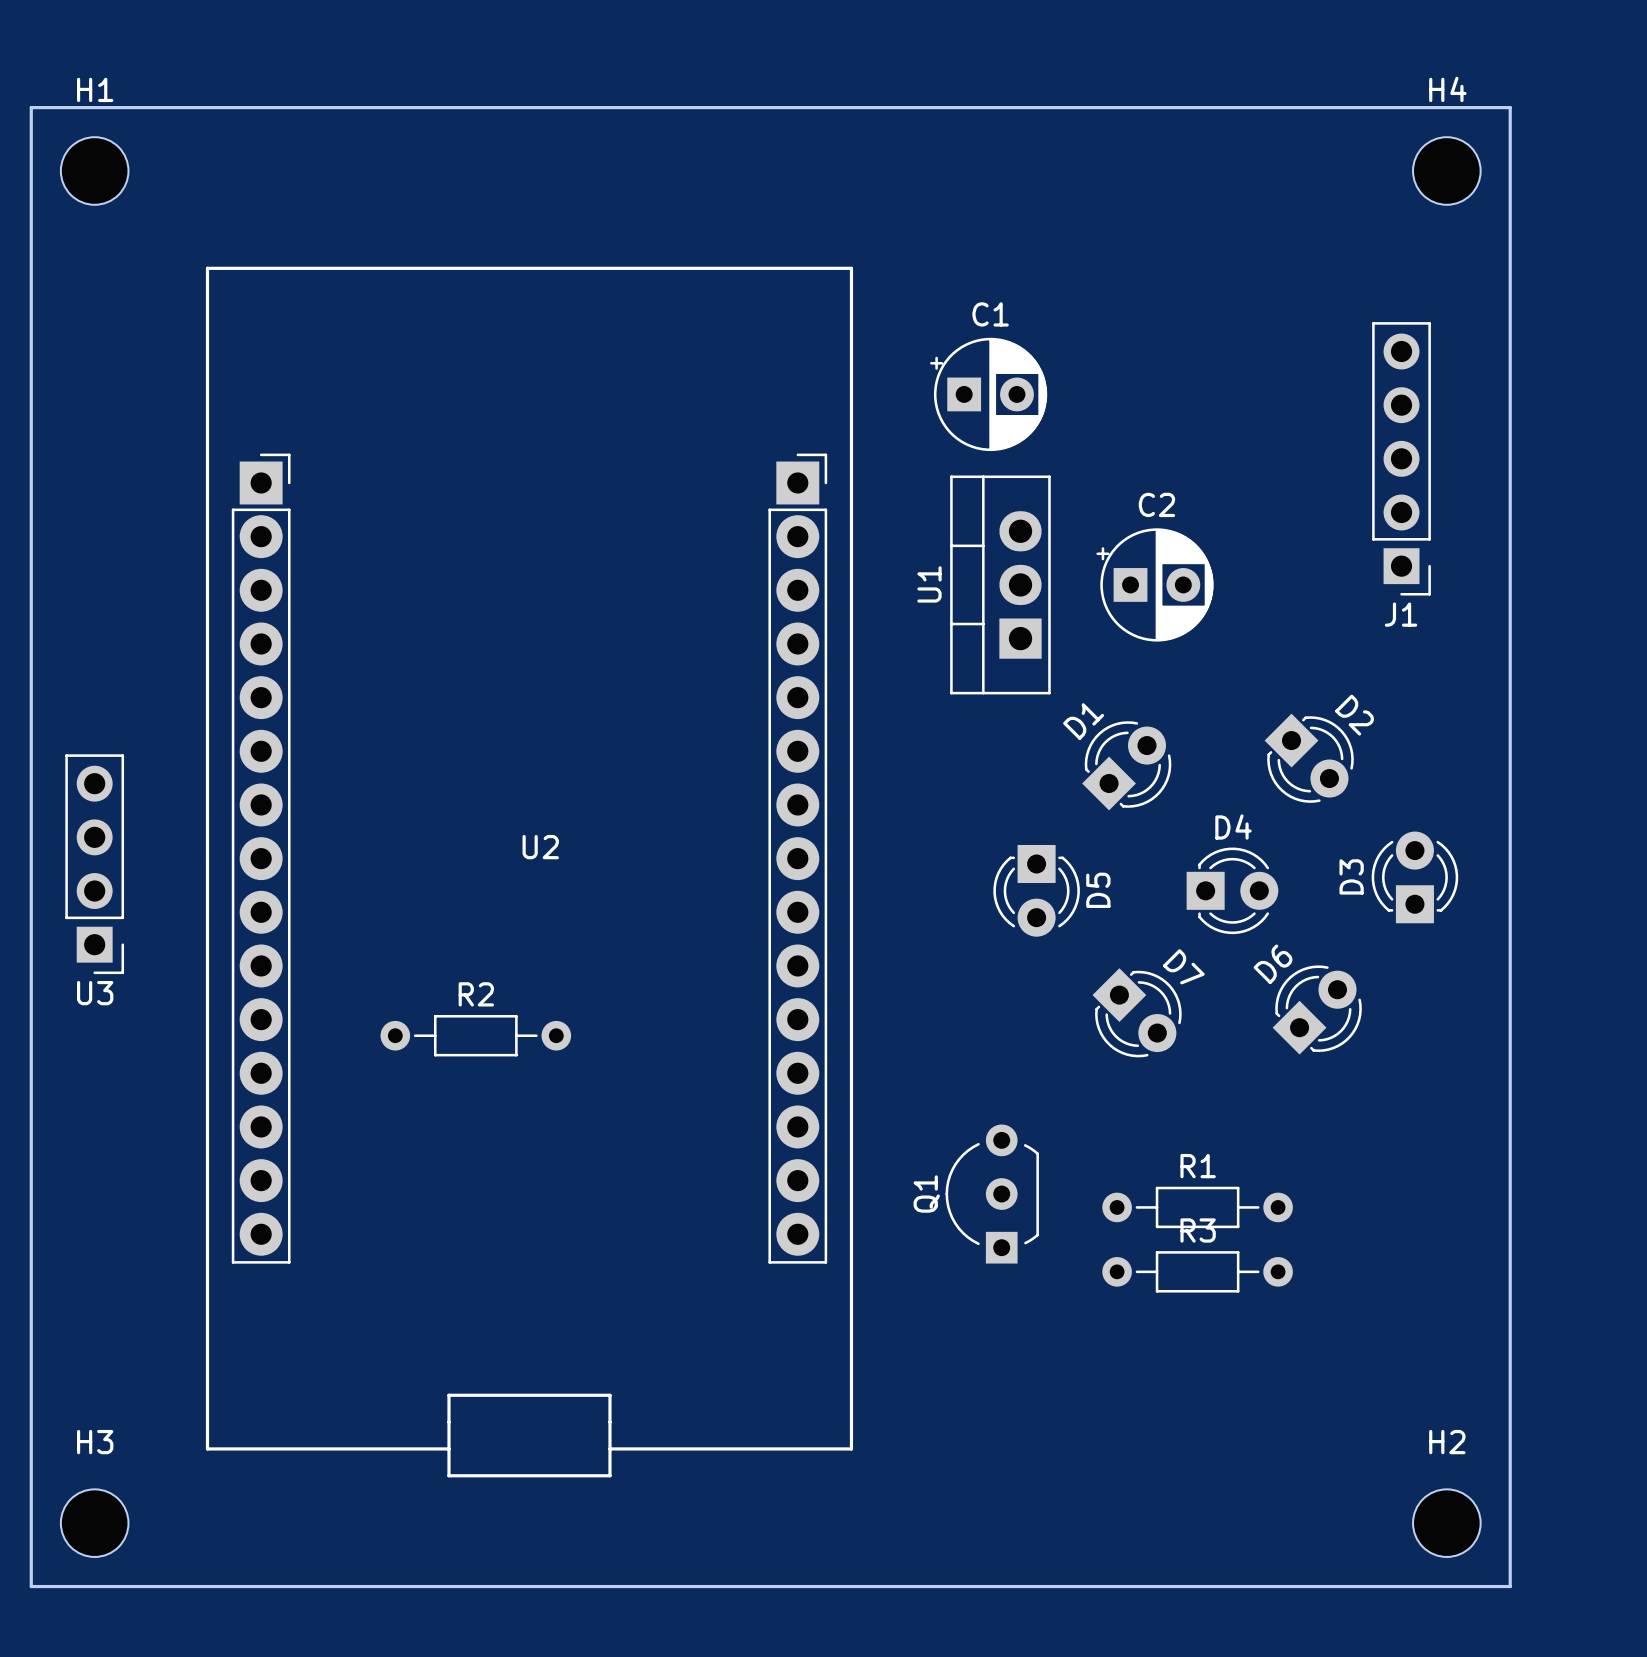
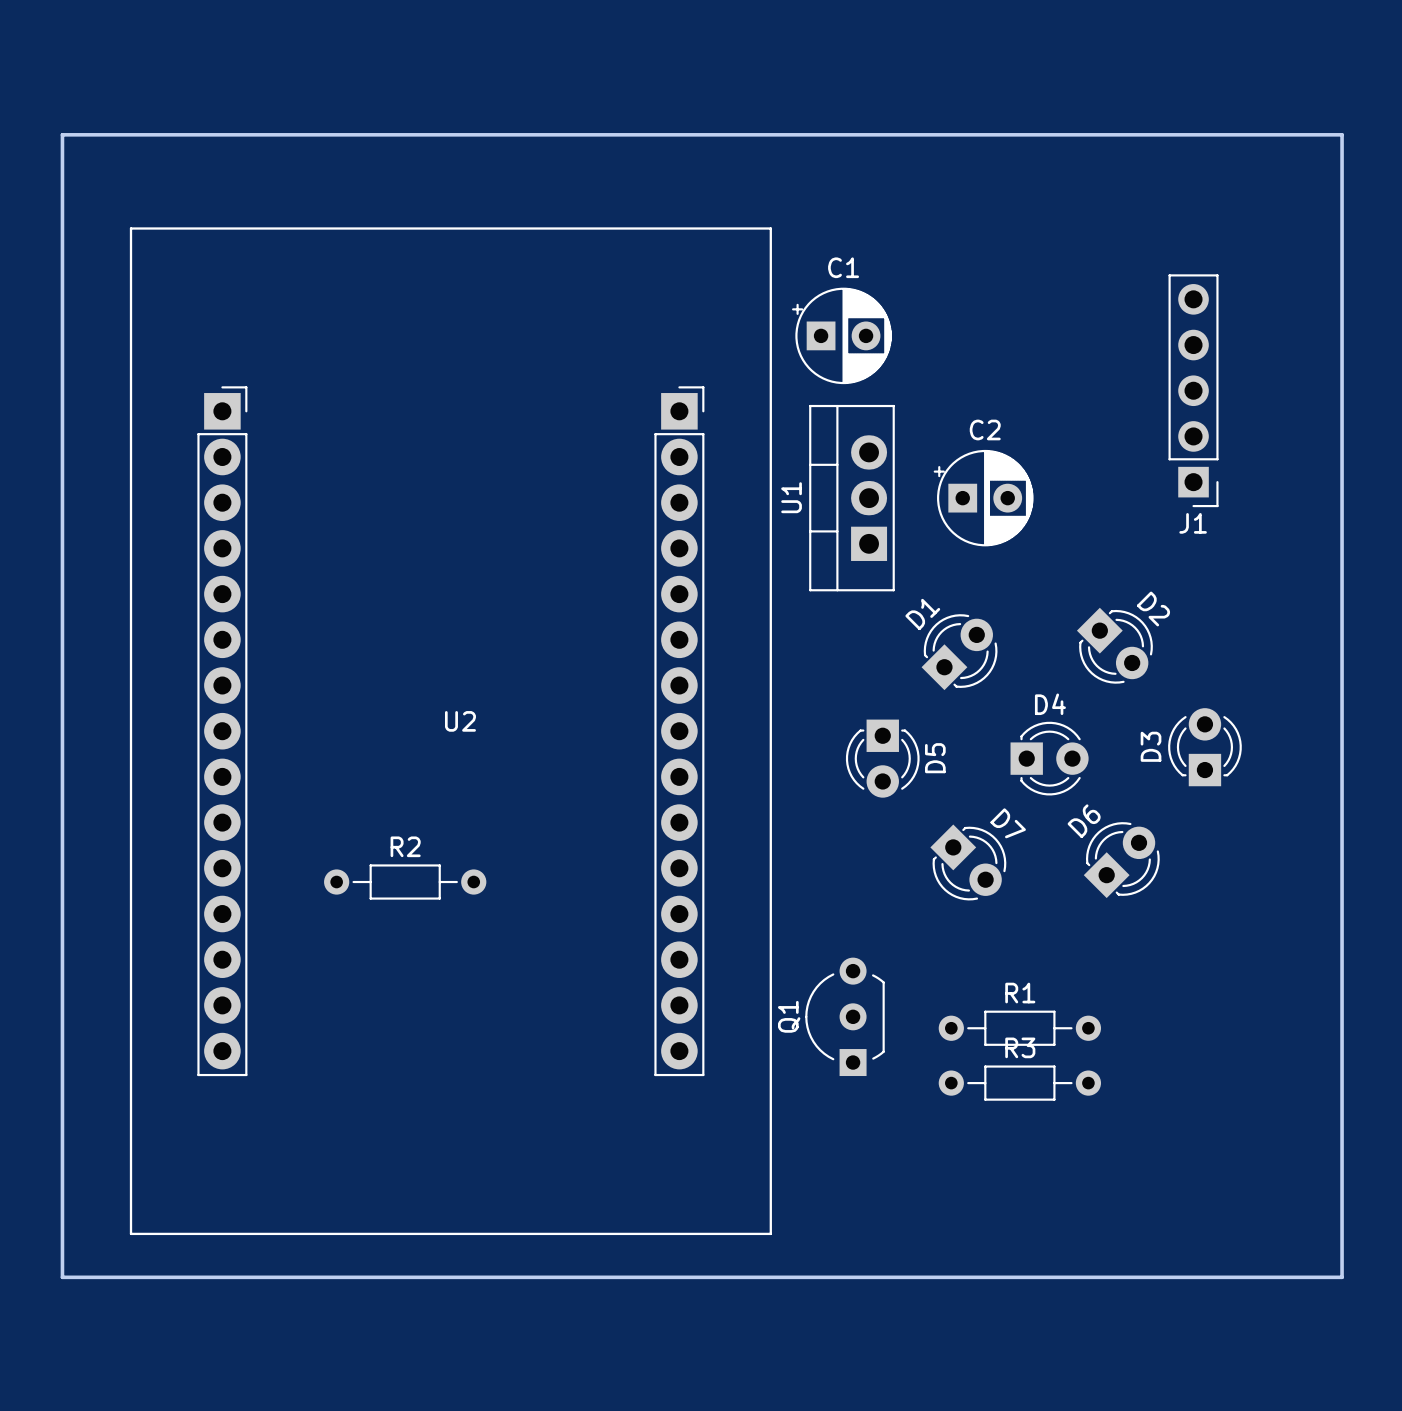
board edge: (31, 107) (31, 1586) (1510, 1586) (1510, 107) (31, 107) -> (62, 134) (62, 1277) (1342, 1277) (1342, 134) (62, 134)
H1: (94, 170) -> none
H4: (1446, 170) -> none
U2 footprint: [205, 266, 854, 1478] -> [129, 227, 772, 1236]
U3: (94, 864) -> none
H3: (94, 1523) -> none
H2: (1446, 1523) -> none

